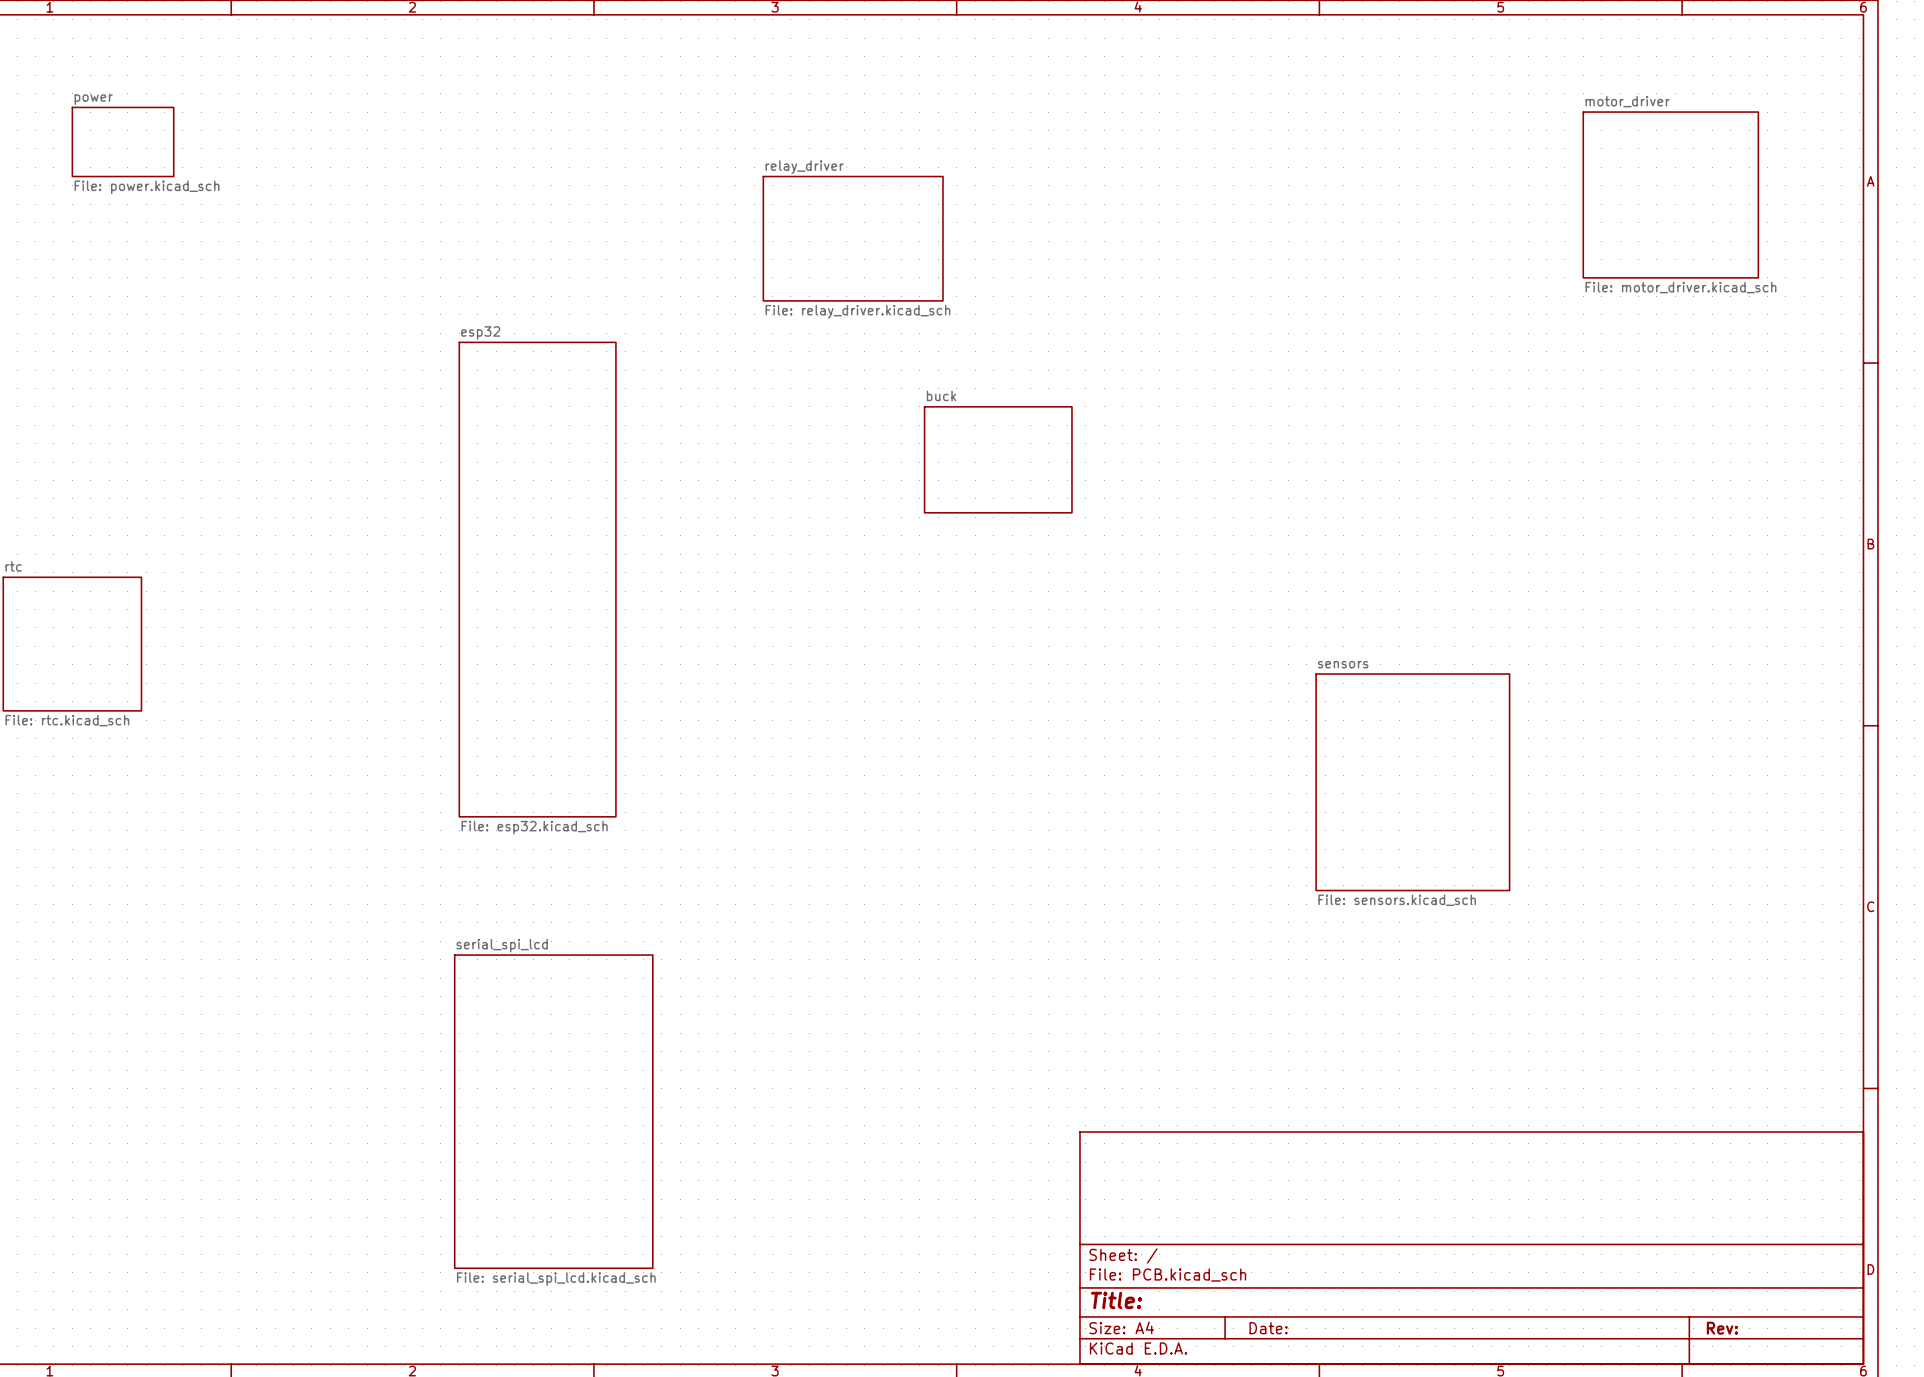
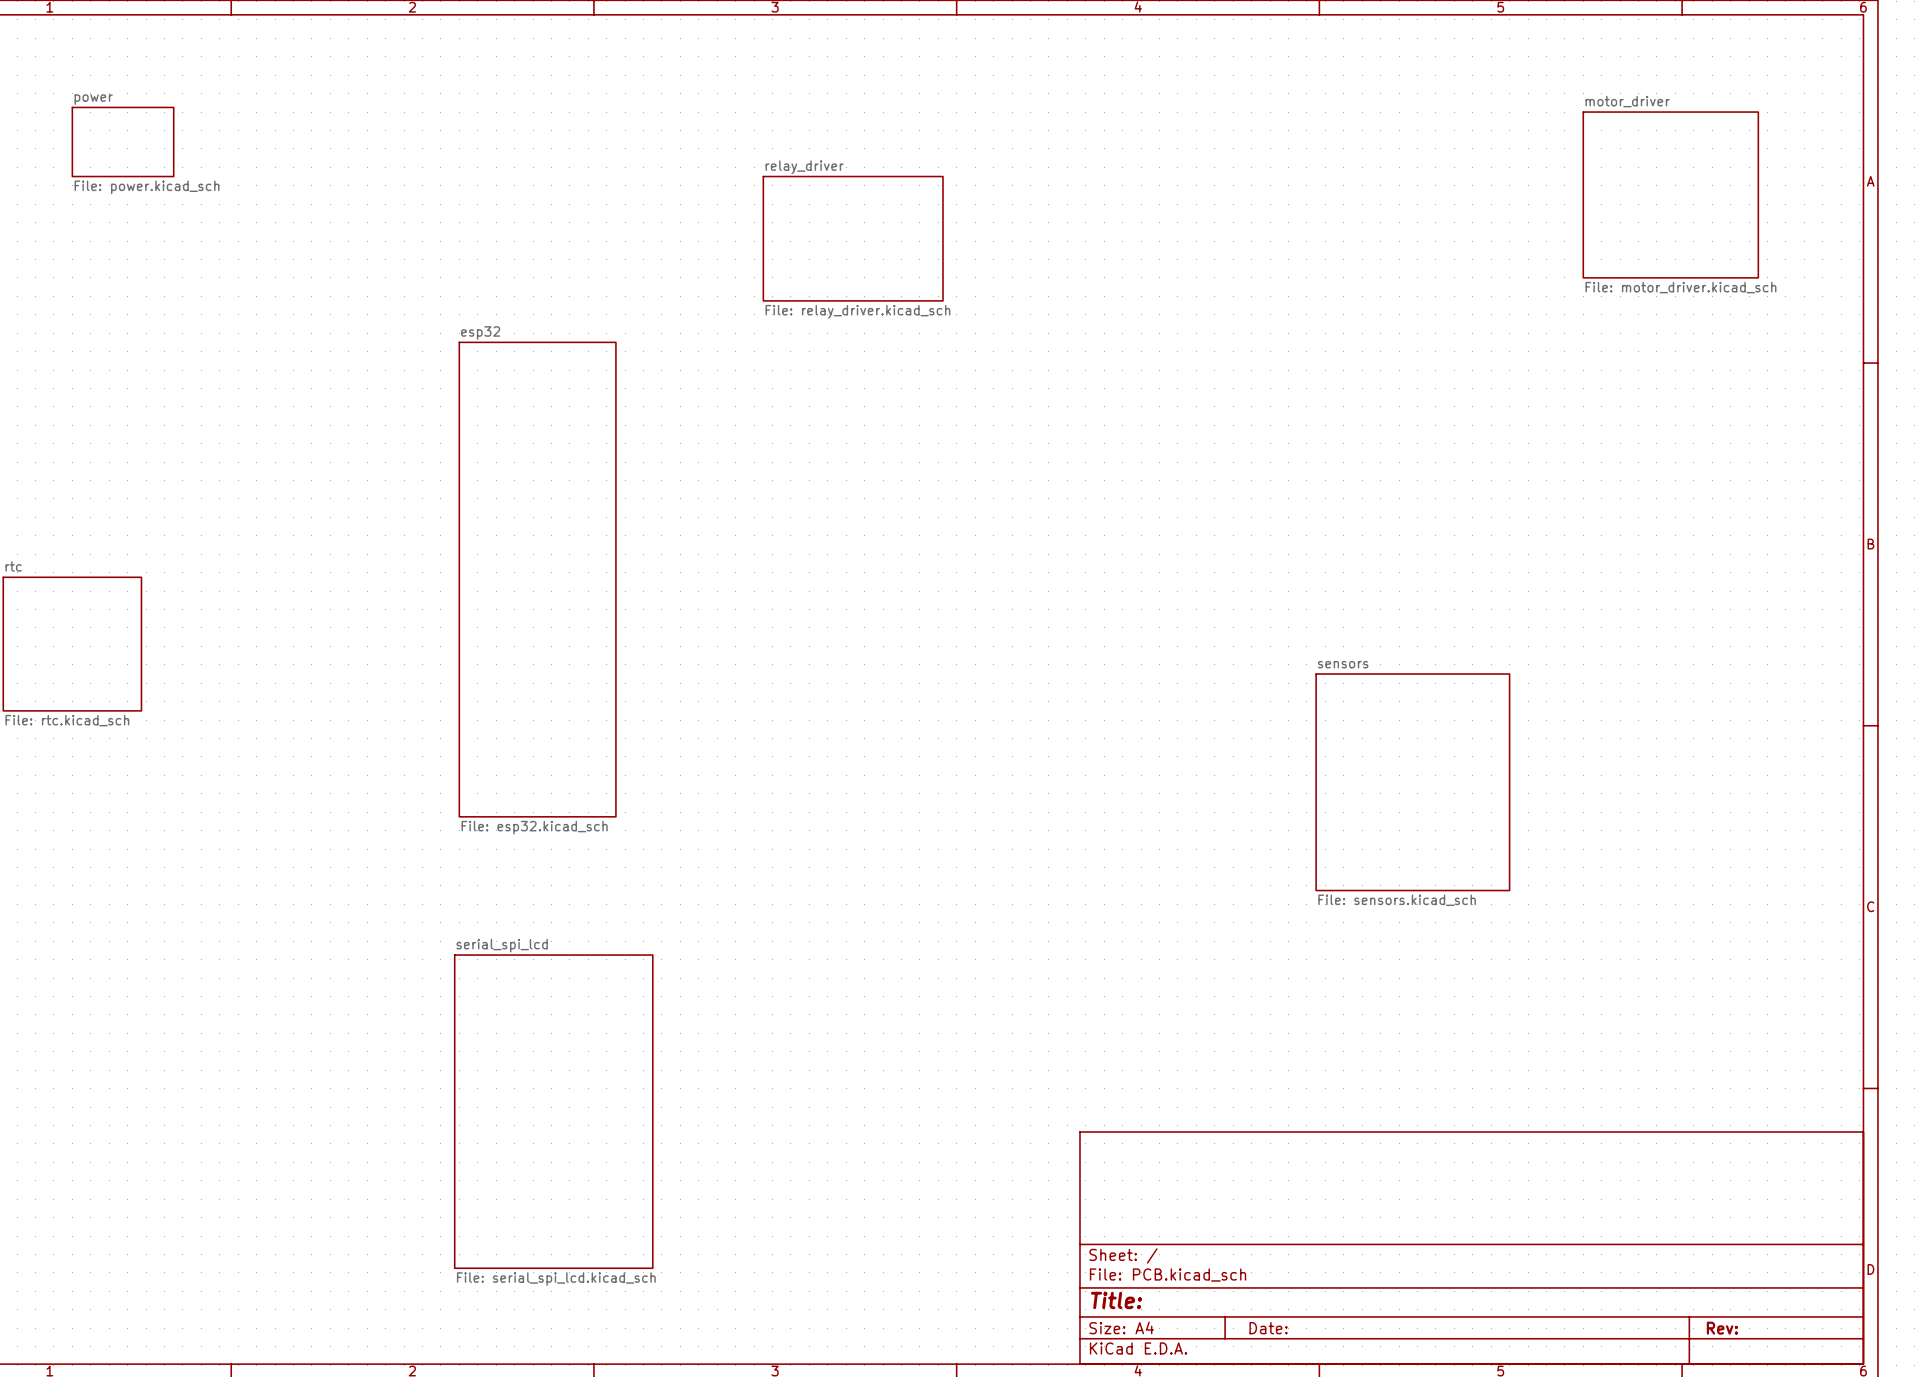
sheet buck: (998, 459) -> none

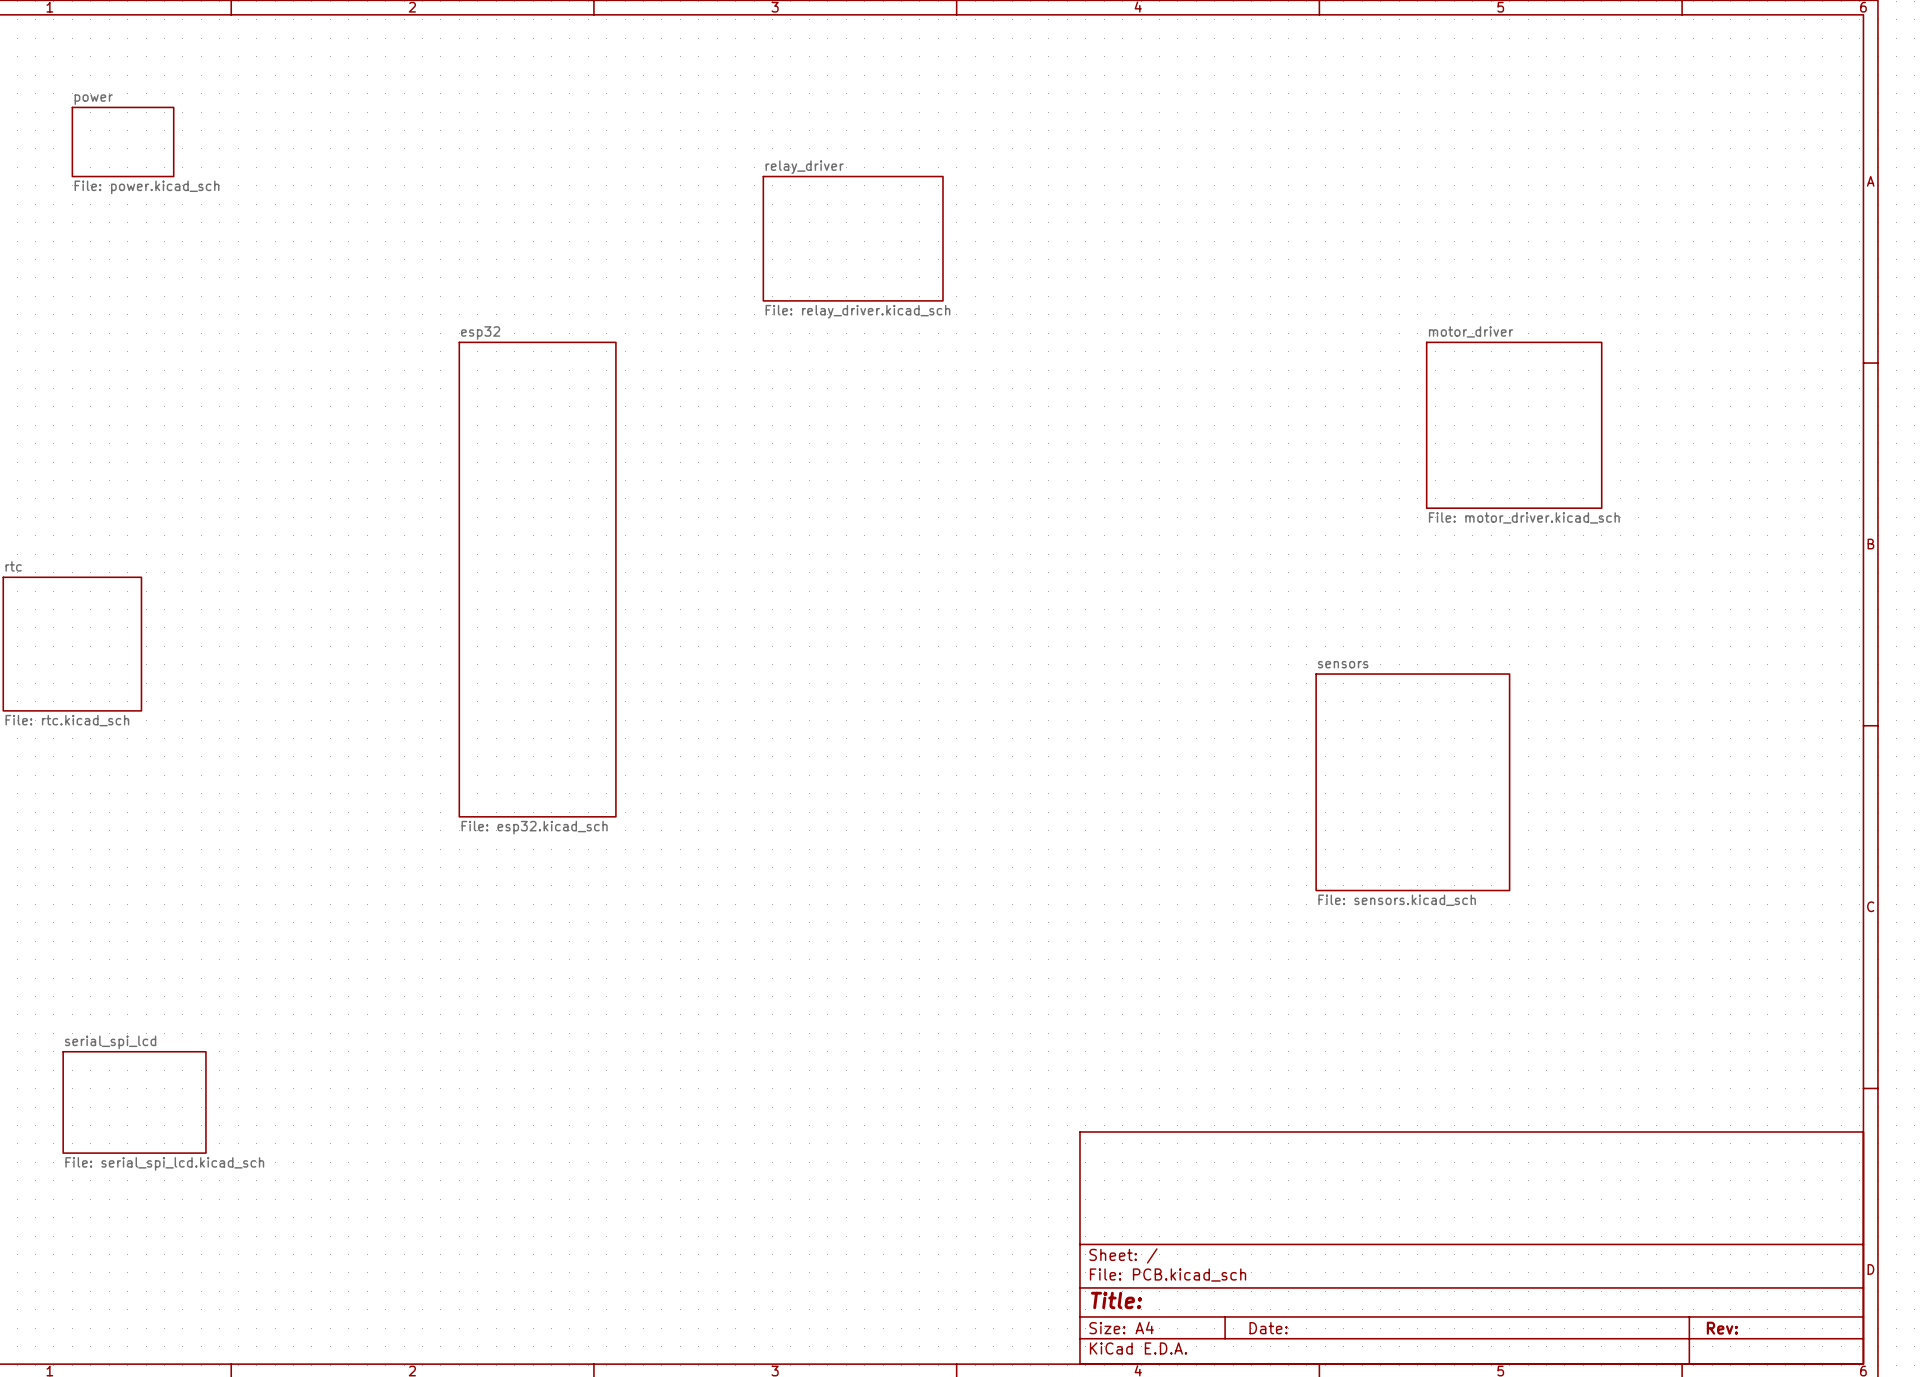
sheet motor_driver: File: motor_driver.kicad_sch (1670, 194) -> none
sheet motor_driver: none -> File: motor_driver.kicad_sch (1514, 425)
sheet serial_spi_lcd: none -> File: serial_spi_lcd.kicad_sch (134, 1102)
sheet serial_spi_lcd: File: serial_spi_lcd.kicad_sch (553, 1111) -> none

